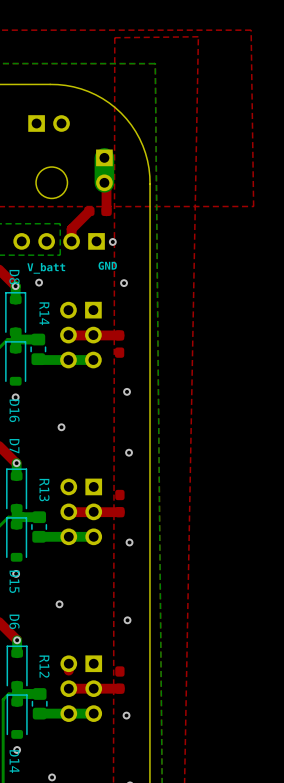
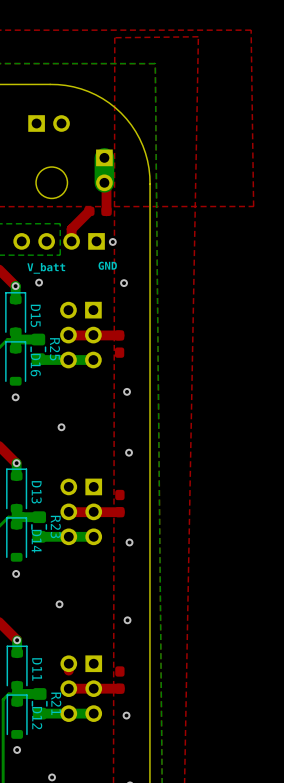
D8 name: D8 (14, 277) -> D15 (35, 315)
R14 name: R14 (44, 313) -> R25 (54, 349)
D16 name position: D16 (14, 410) -> D16 (35, 365)
D7 name: D7 (14, 446) -> D13 (36, 492)
R13 name: R13 (44, 490) -> R23 (55, 526)
D15 name: D15 (14, 581) -> D14 (36, 541)
D6 name: D6 (14, 621) -> D11 (37, 669)
R12 name: R12 (44, 666) -> R21 (56, 703)
D14 name: D14 (14, 761) -> D12 (37, 718)

